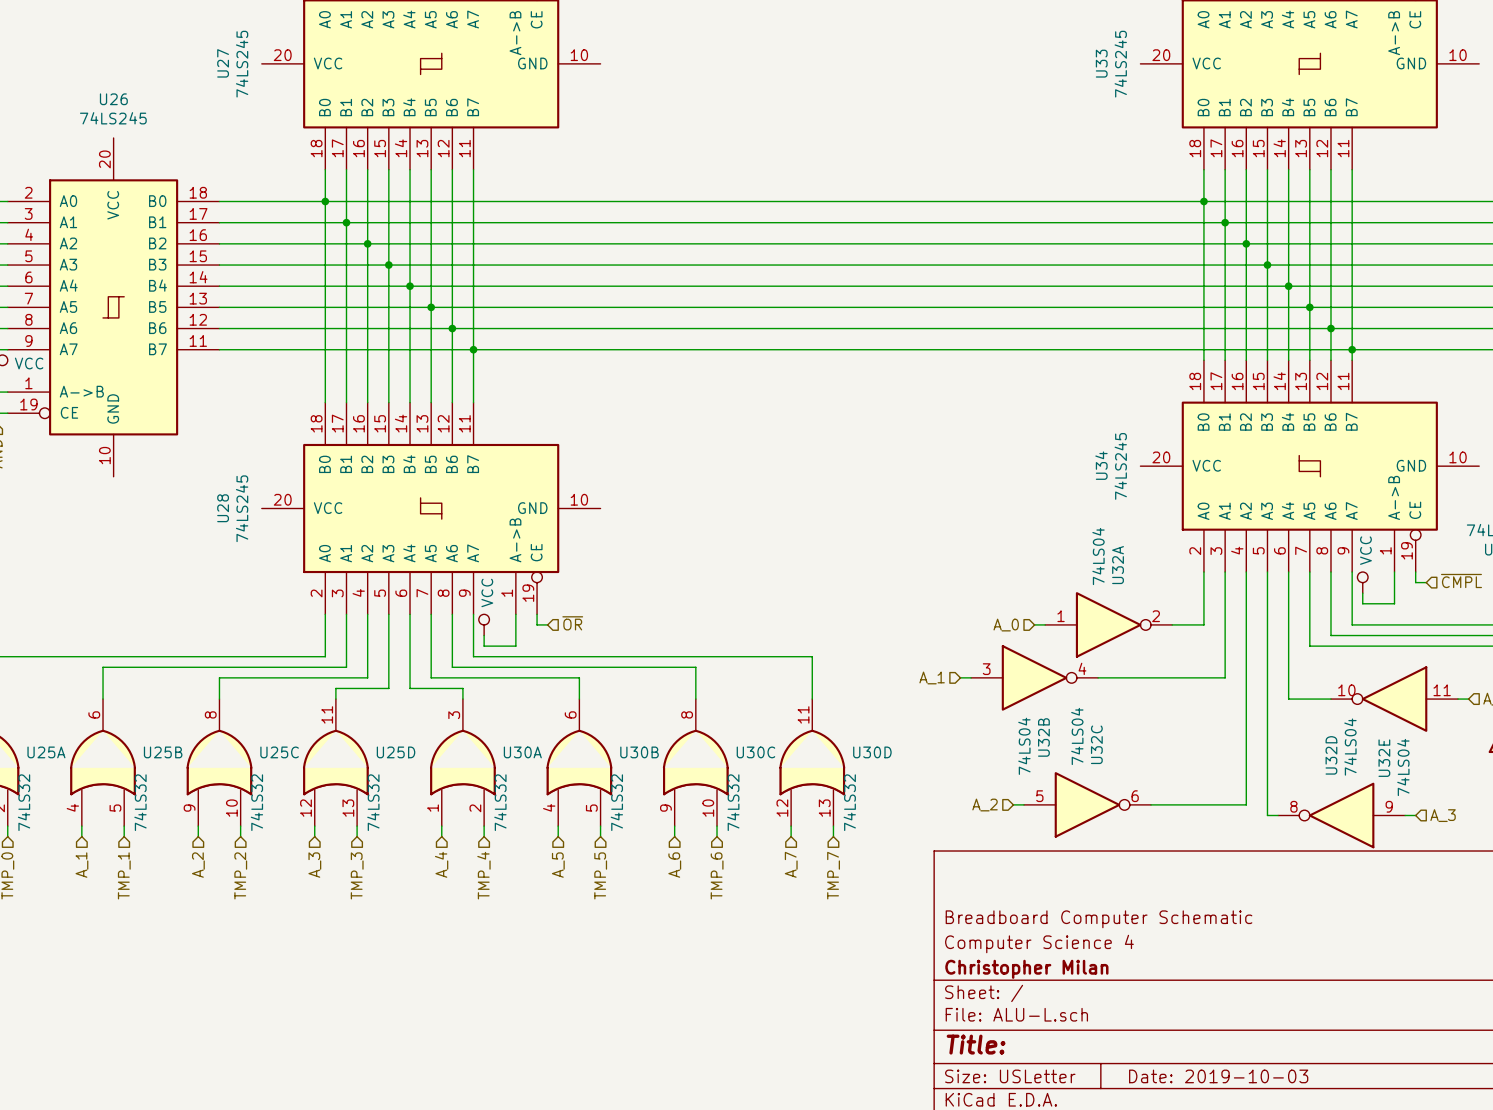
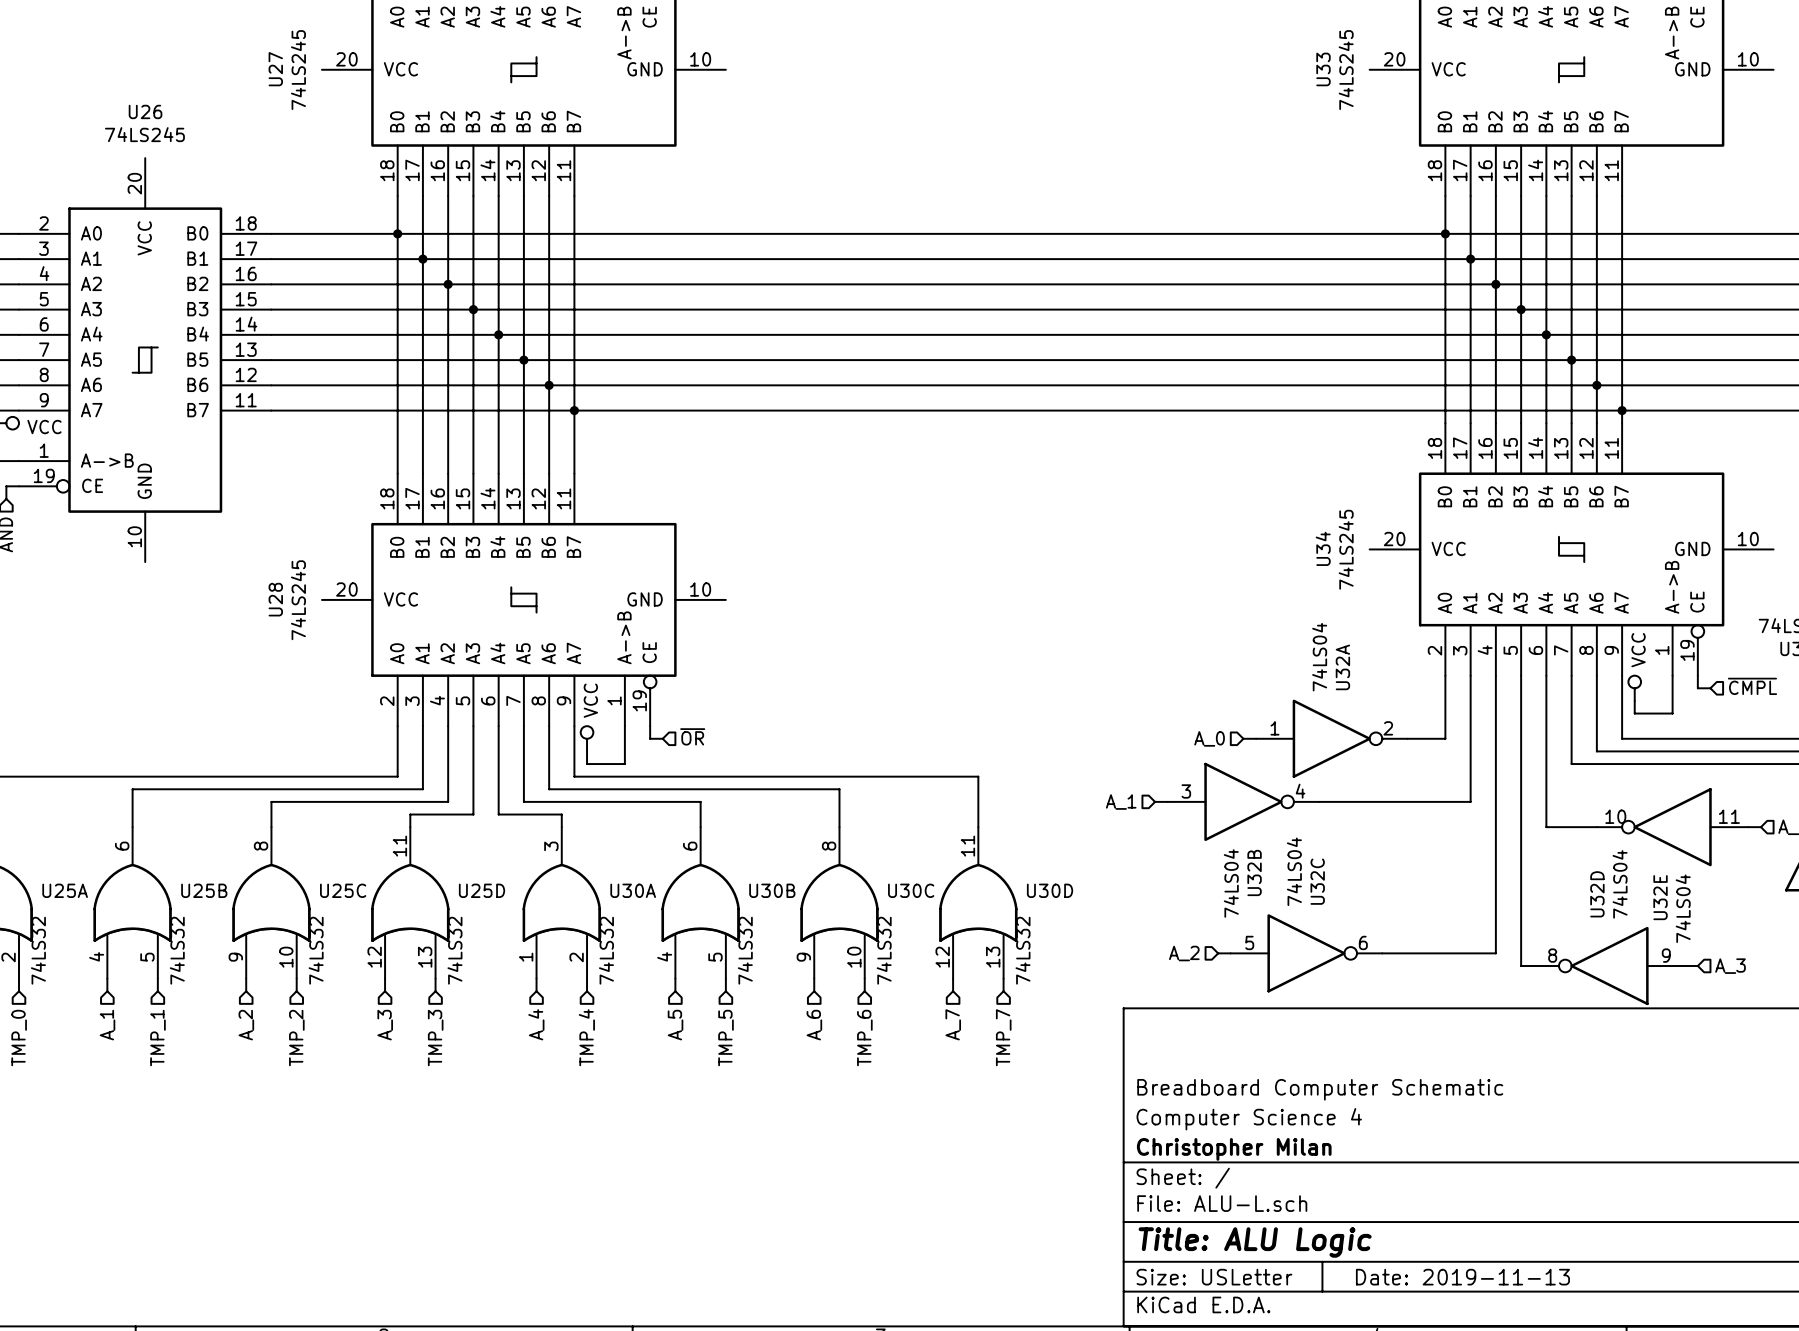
title block: Title: (976, 1044) -> Title: ALU Logic (1255, 1242)
title block: Date: 2019-10-03 (1218, 1076) -> Date: 2019-11-13 (1462, 1277)

